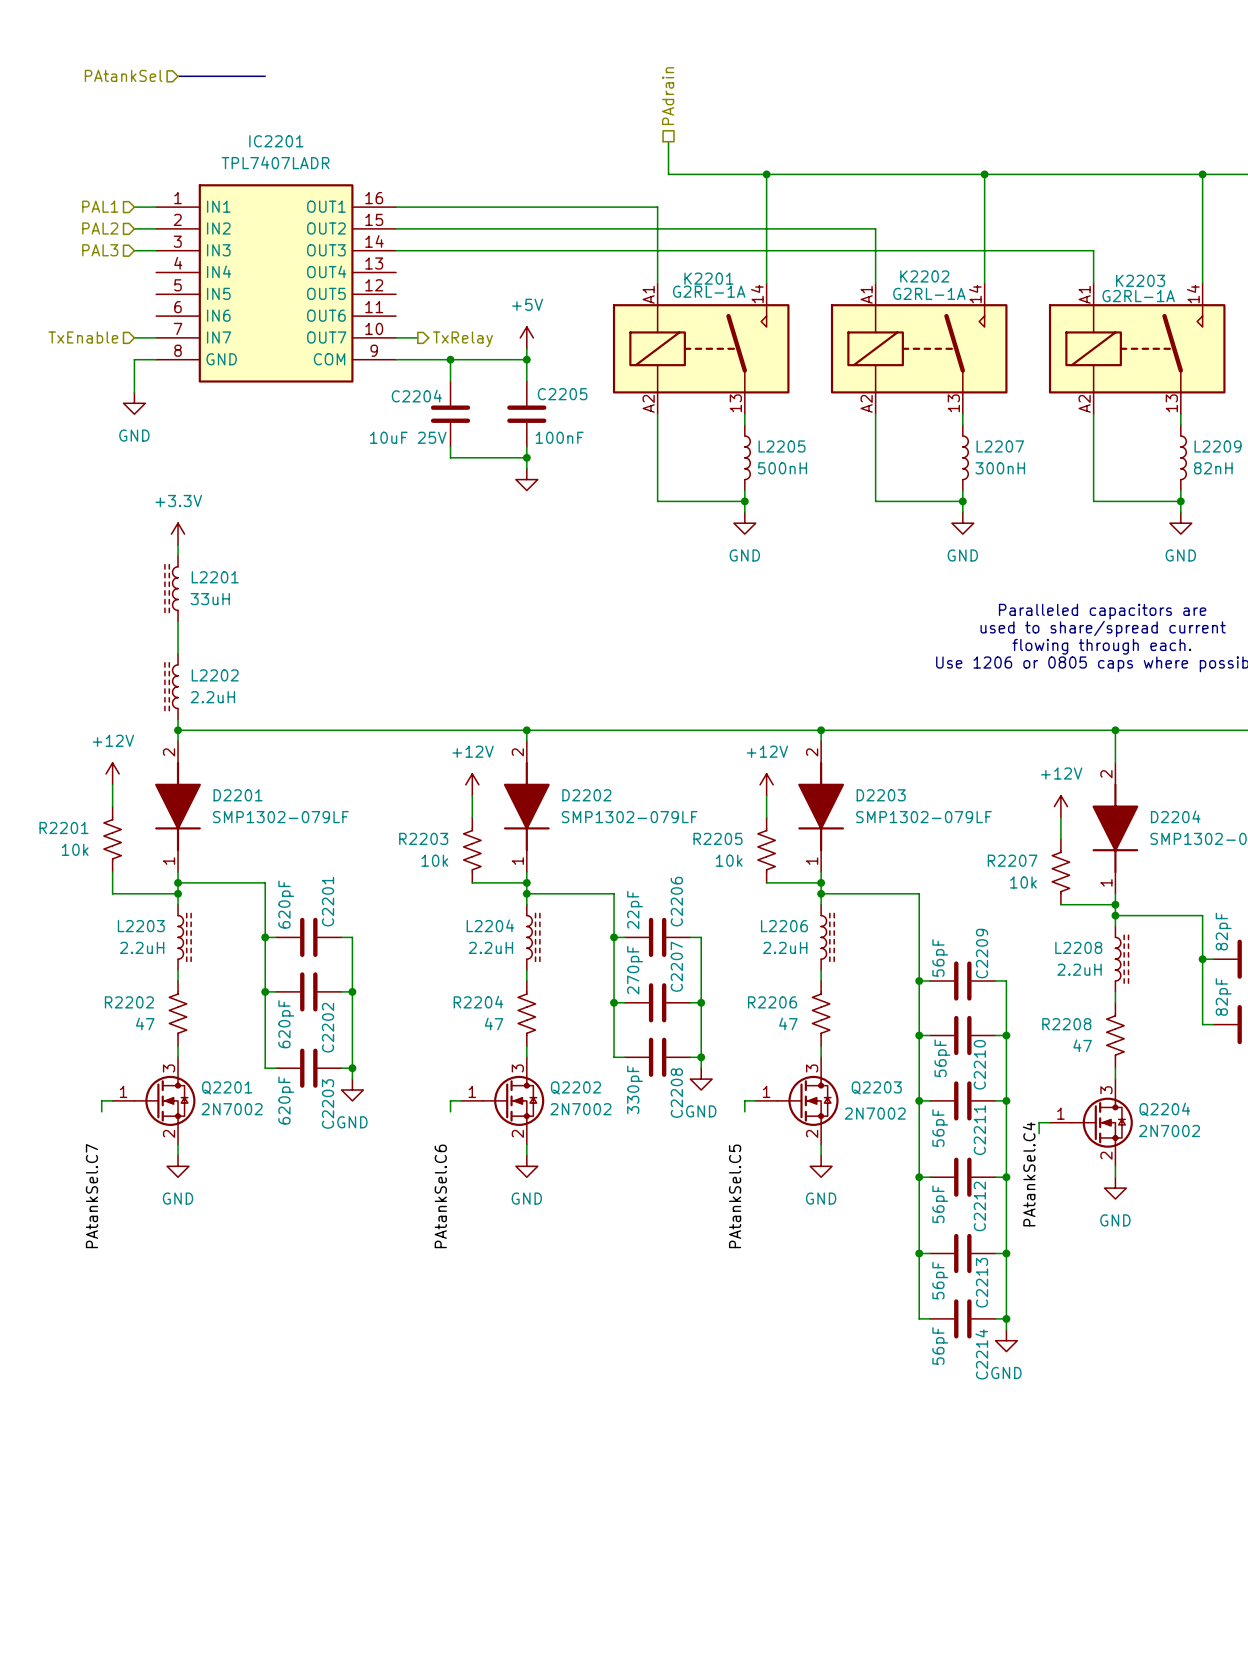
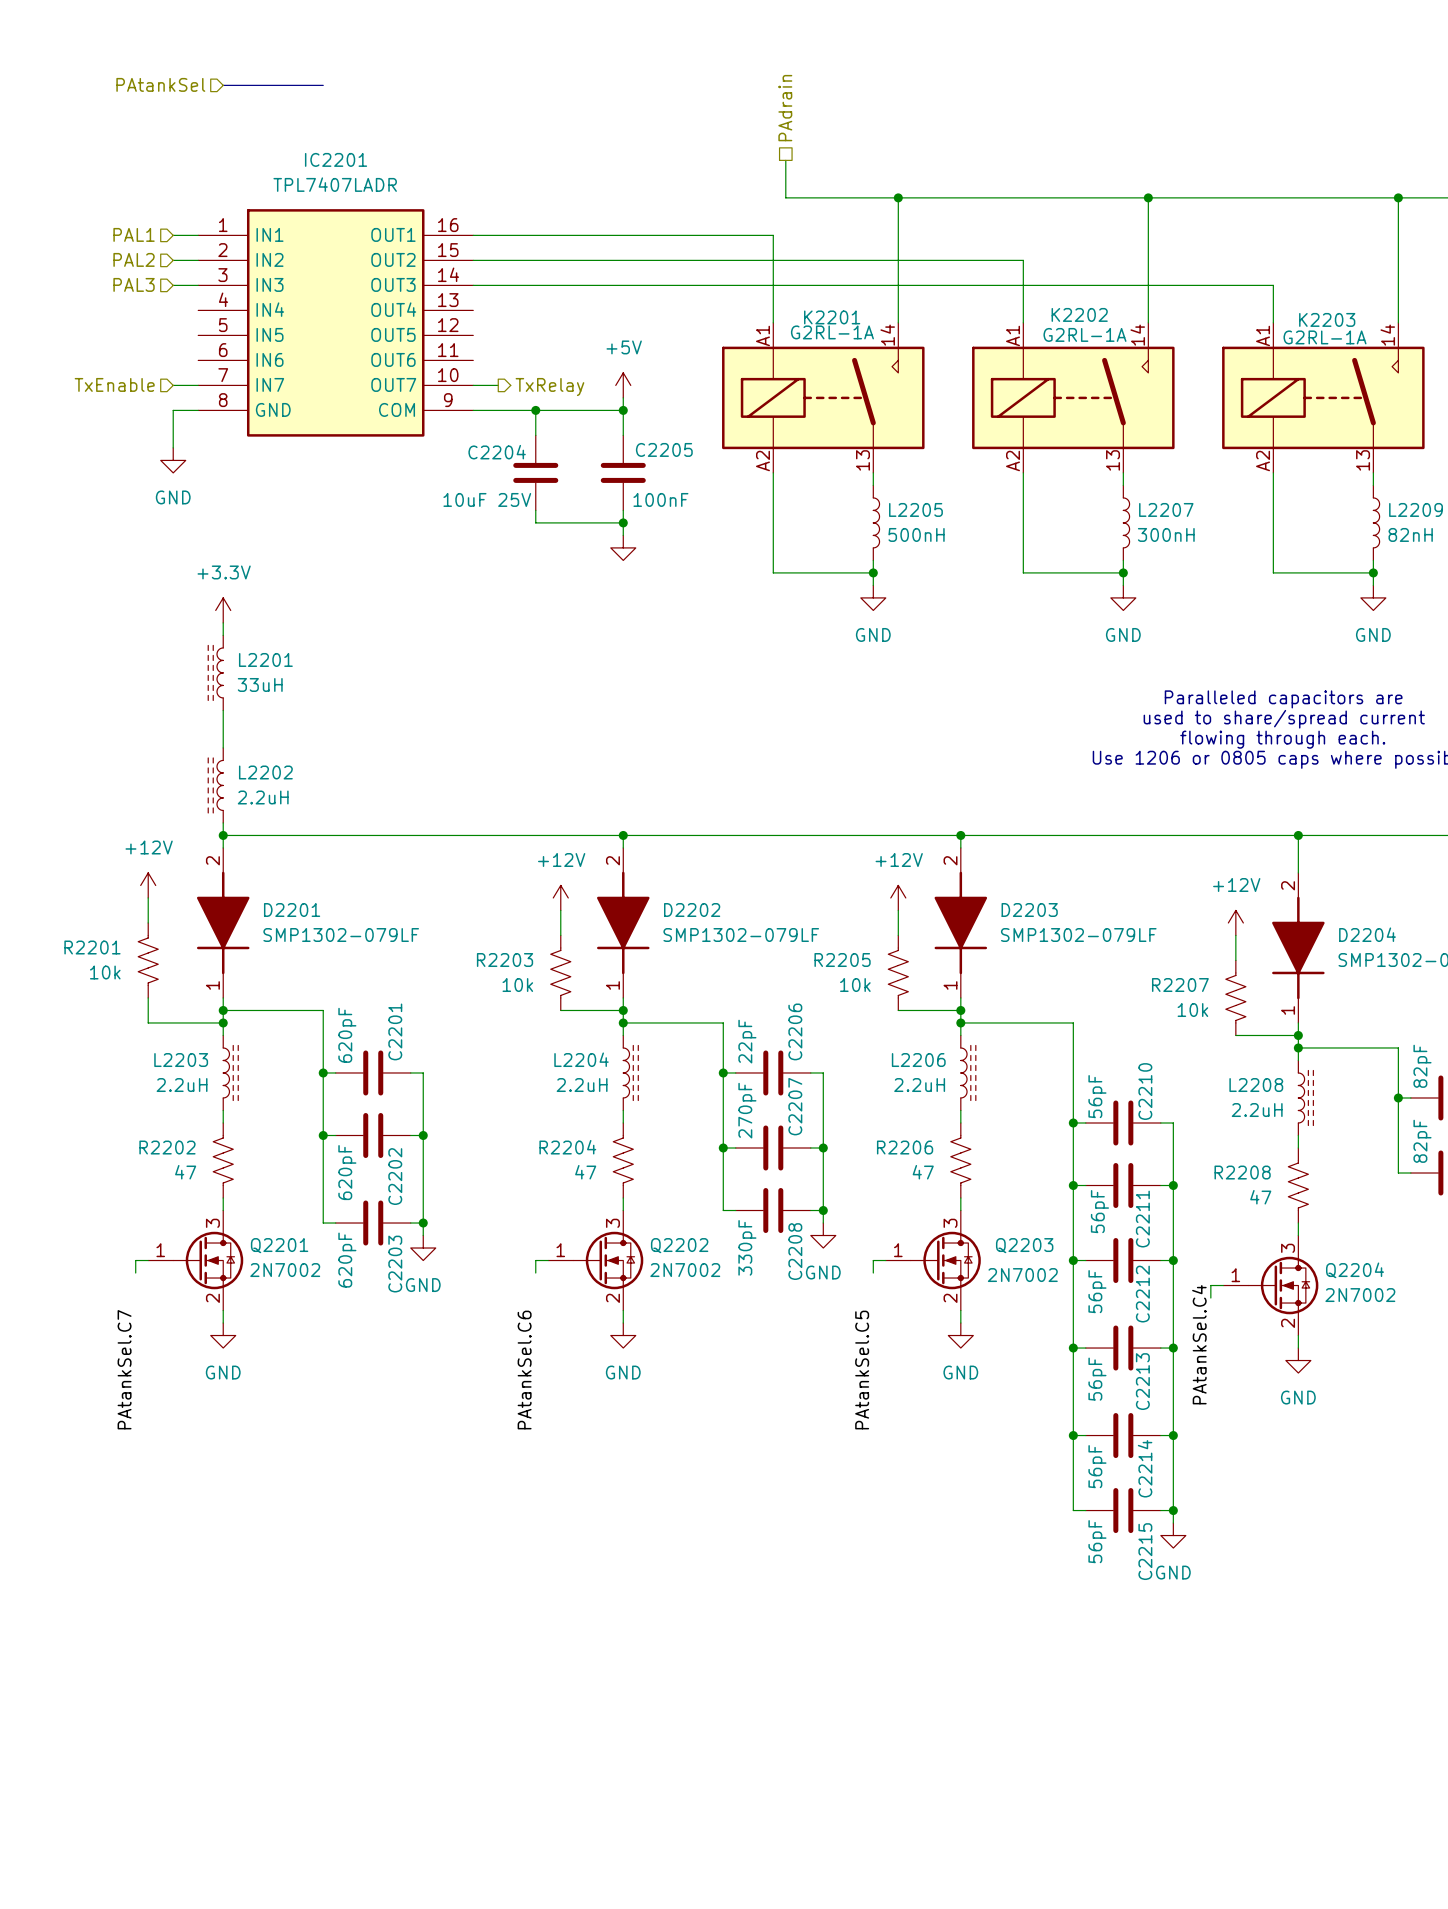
C2209 name: C2209 (982, 953) -> C2210 (1145, 1091)
C2210 name: C2210 (979, 1064) -> C2211 (1142, 1219)
C2211 name: C2211 (979, 1130) -> C2212 (1142, 1294)
C2212 name: C2212 (979, 1206) -> C2213 (1142, 1381)
C2213 name: C2213 (982, 1282) -> C2214 (1145, 1468)
C2214 name: C2214 (981, 1354) -> C2215 (1145, 1551)

